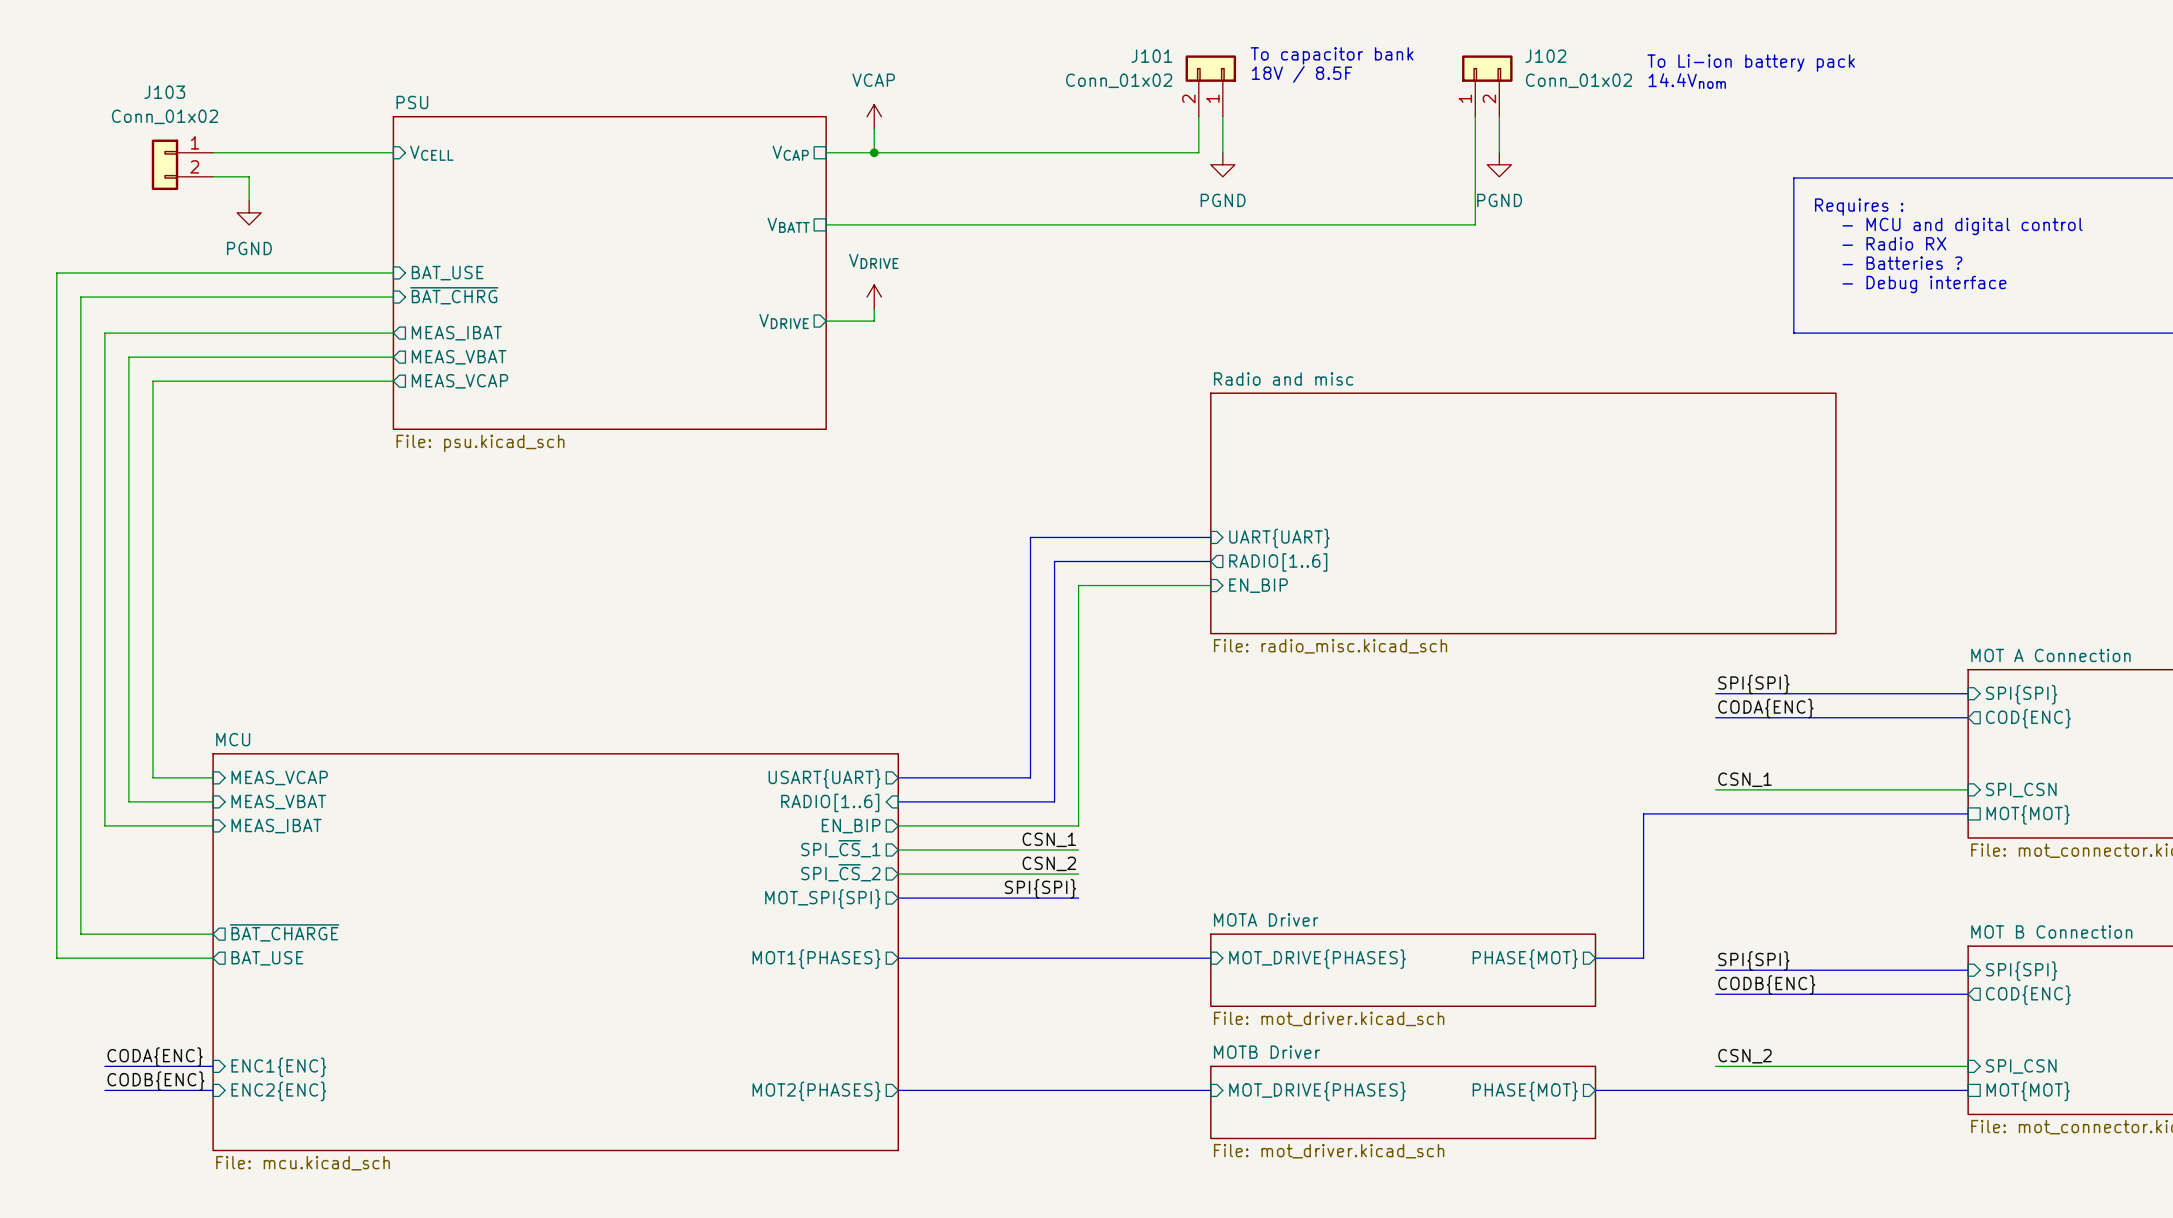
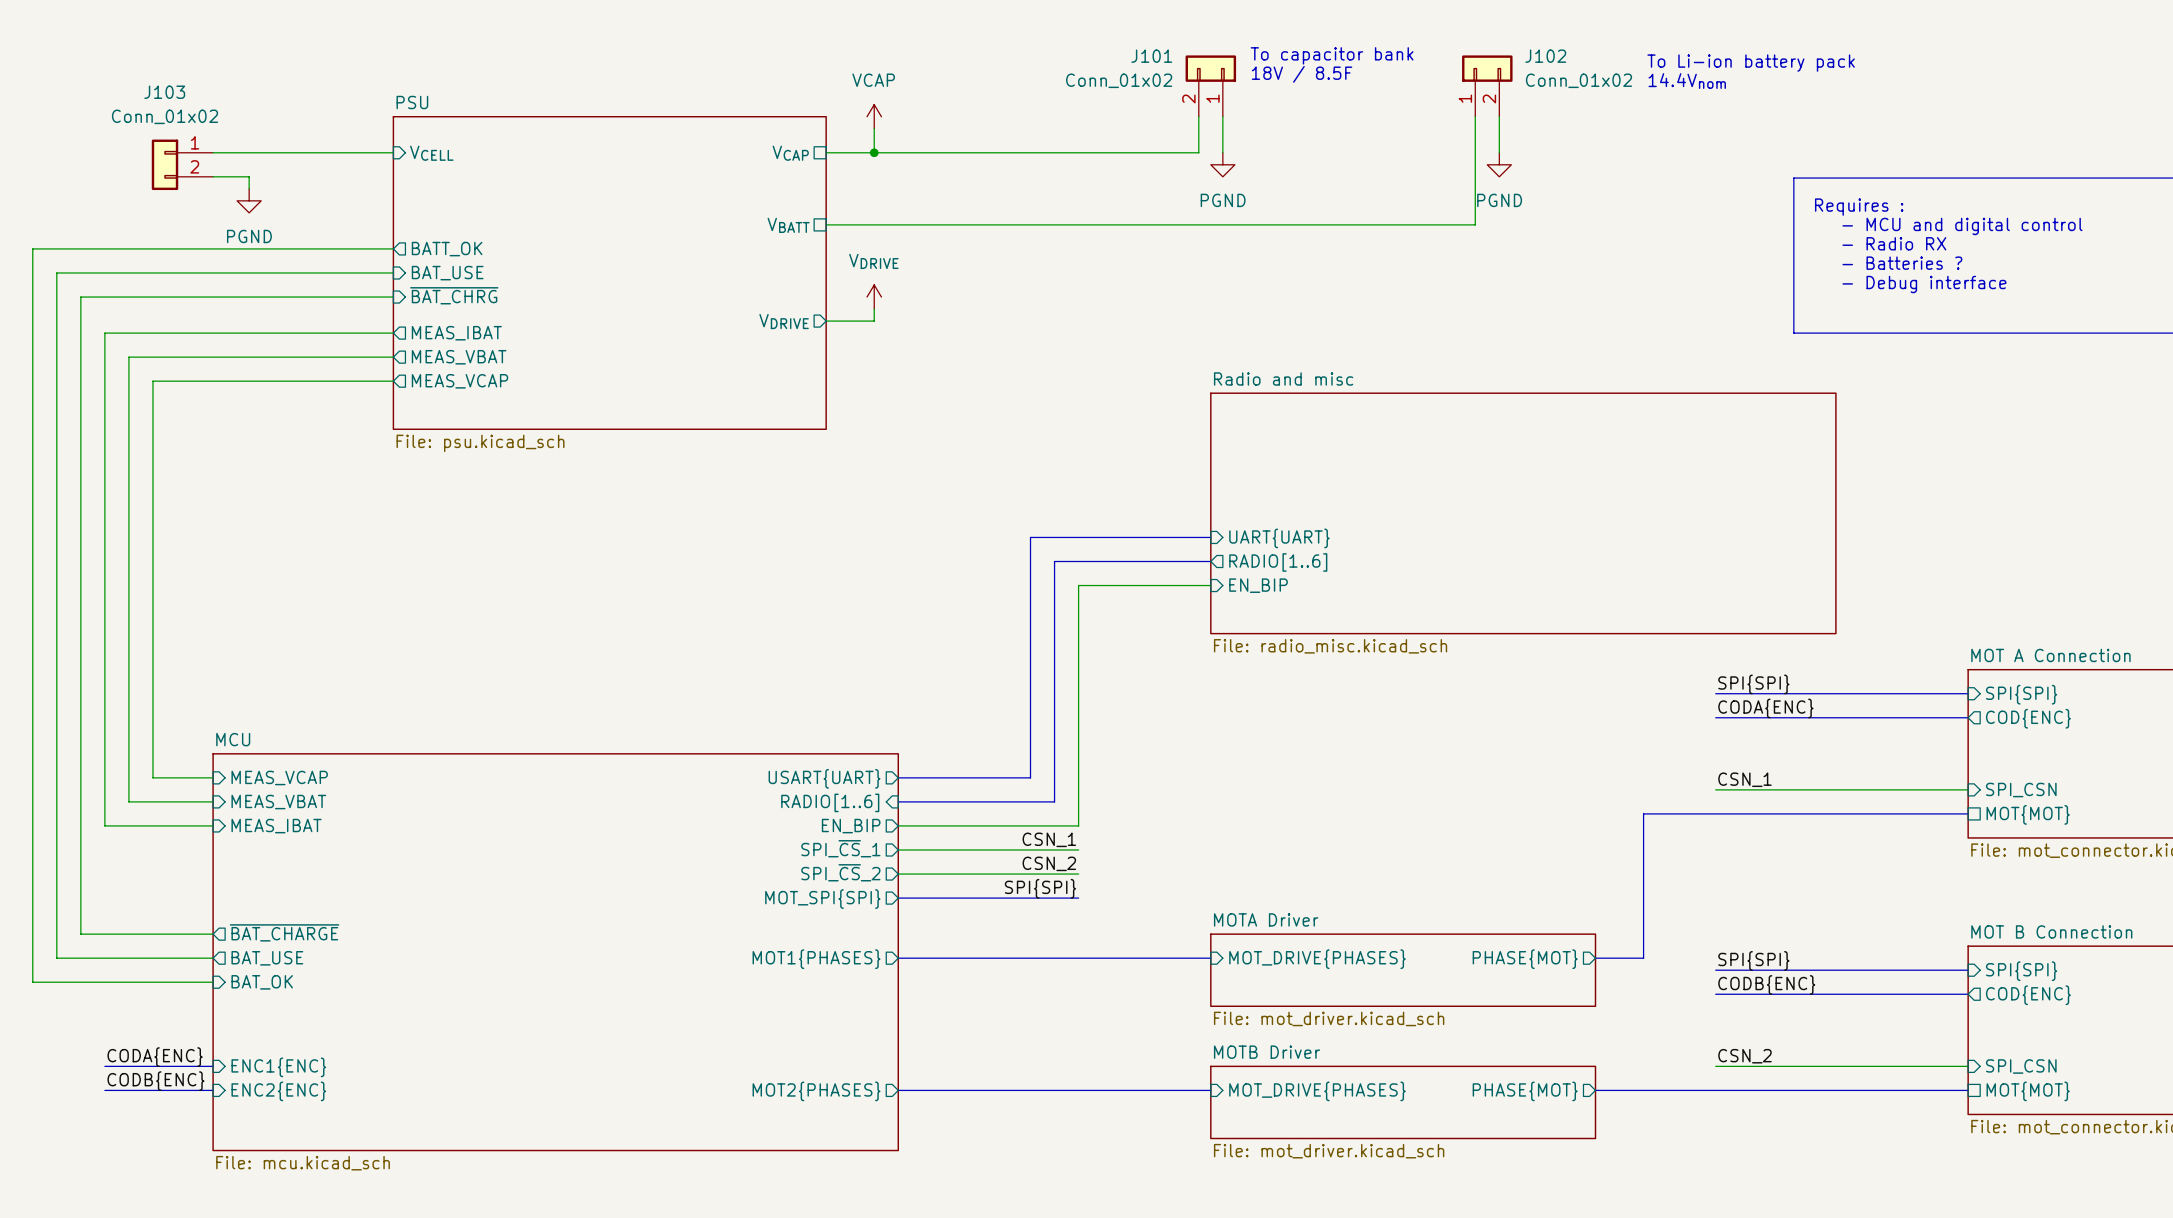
power symbol position: PGND (249, 212) -> PGND (249, 200)
wire: none -> (393, 248) (32, 248) (32, 982) (213, 982)
sheet pin: none -> BATT_OK (447, 249)
sheet pin: none -> BAT_OK (262, 982)

